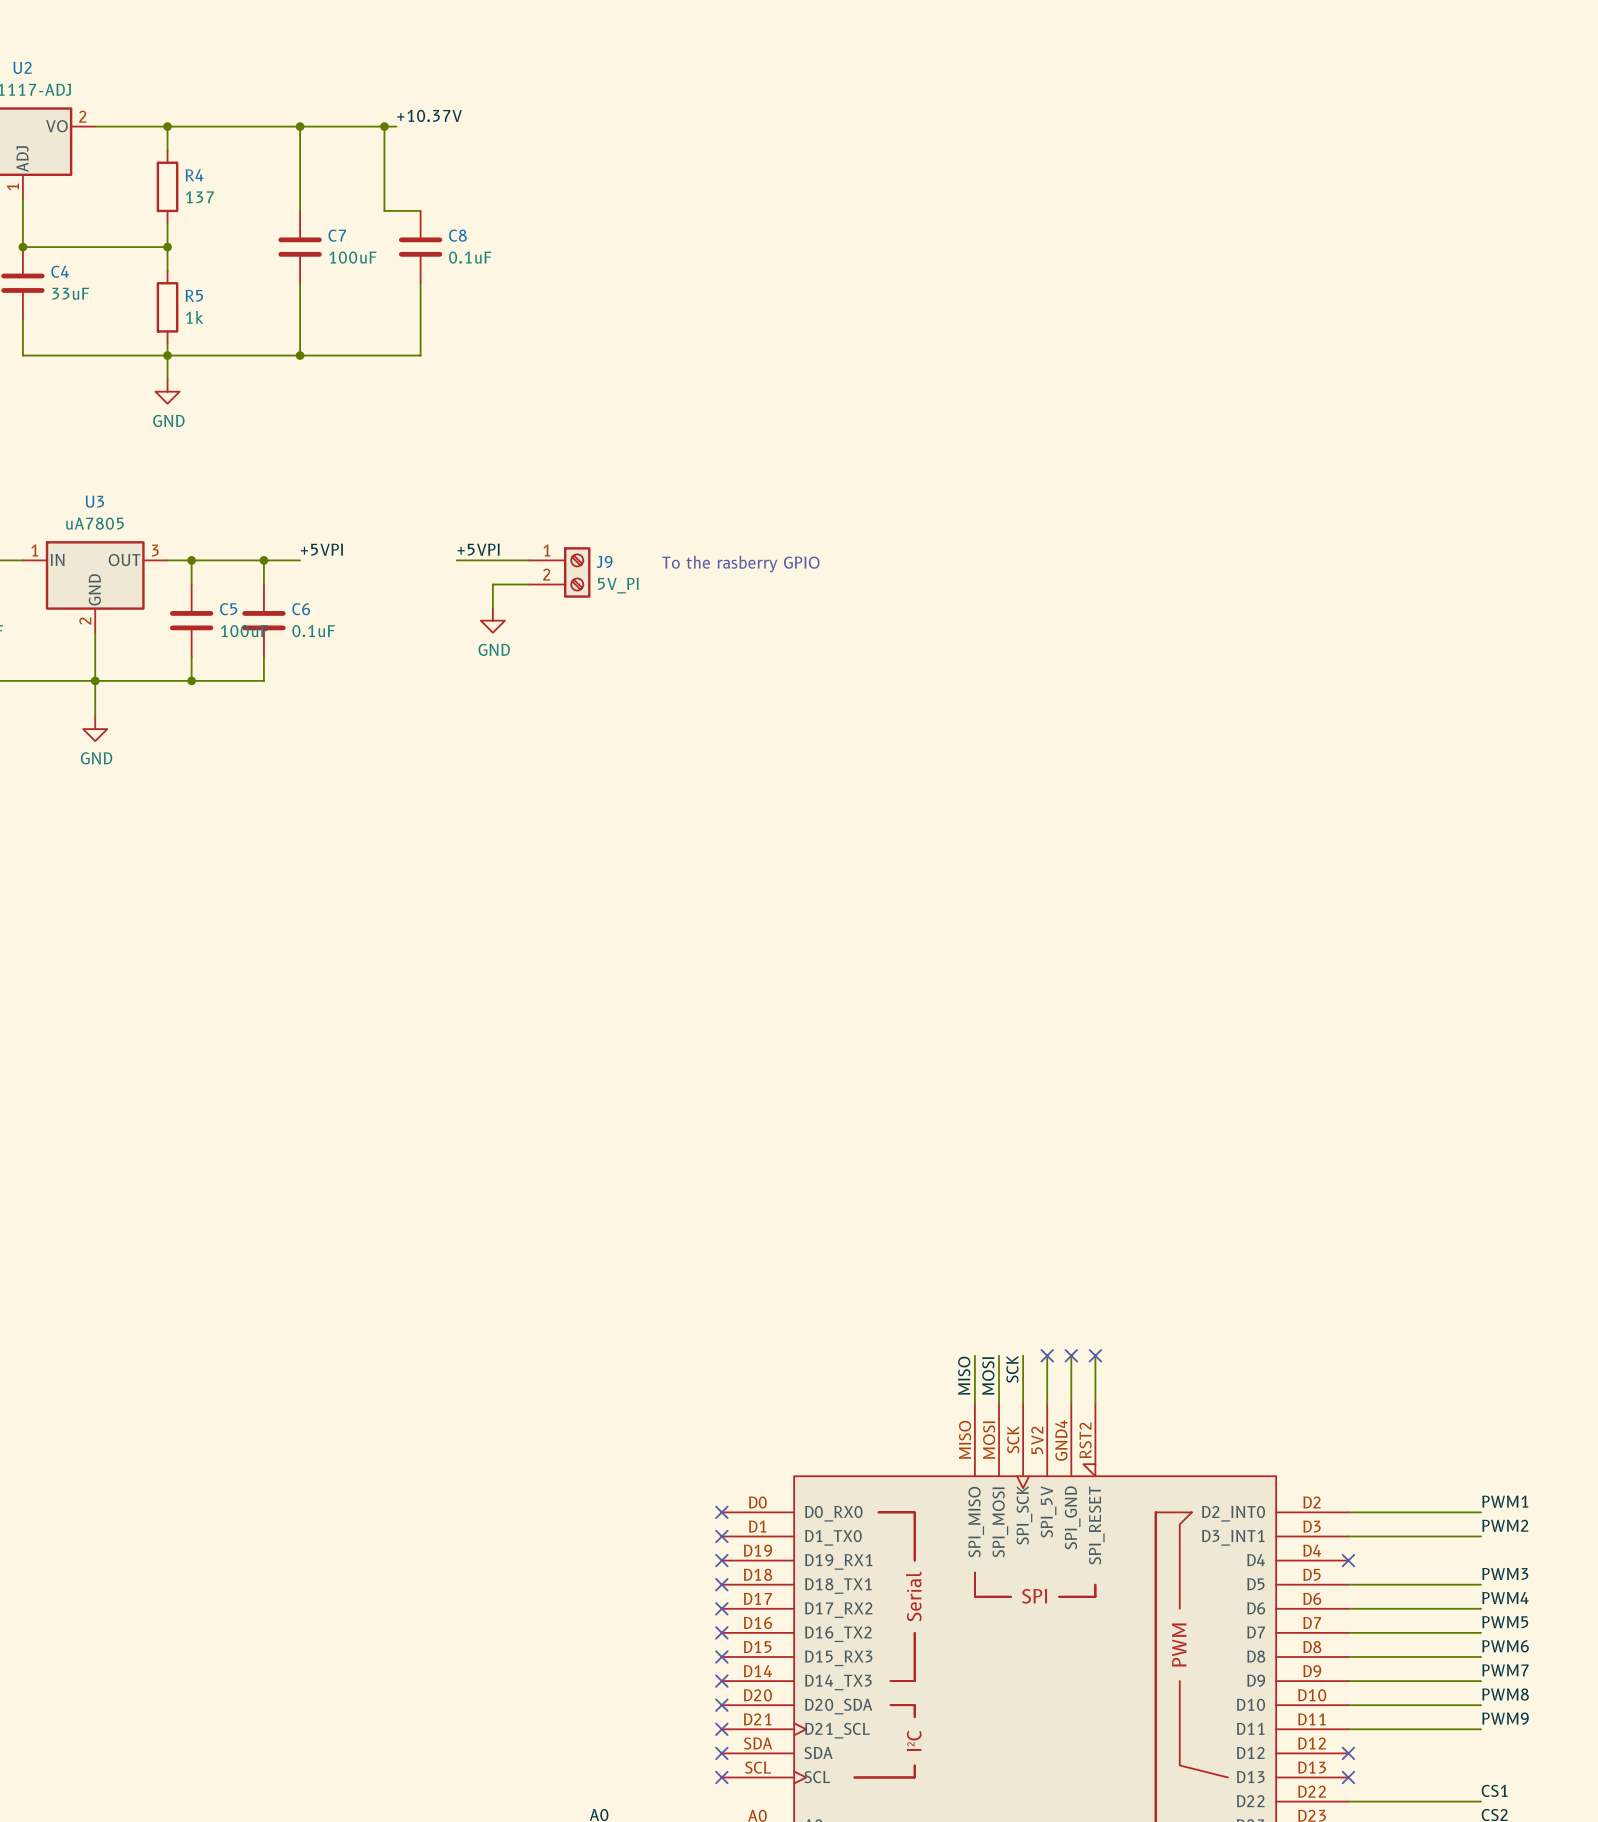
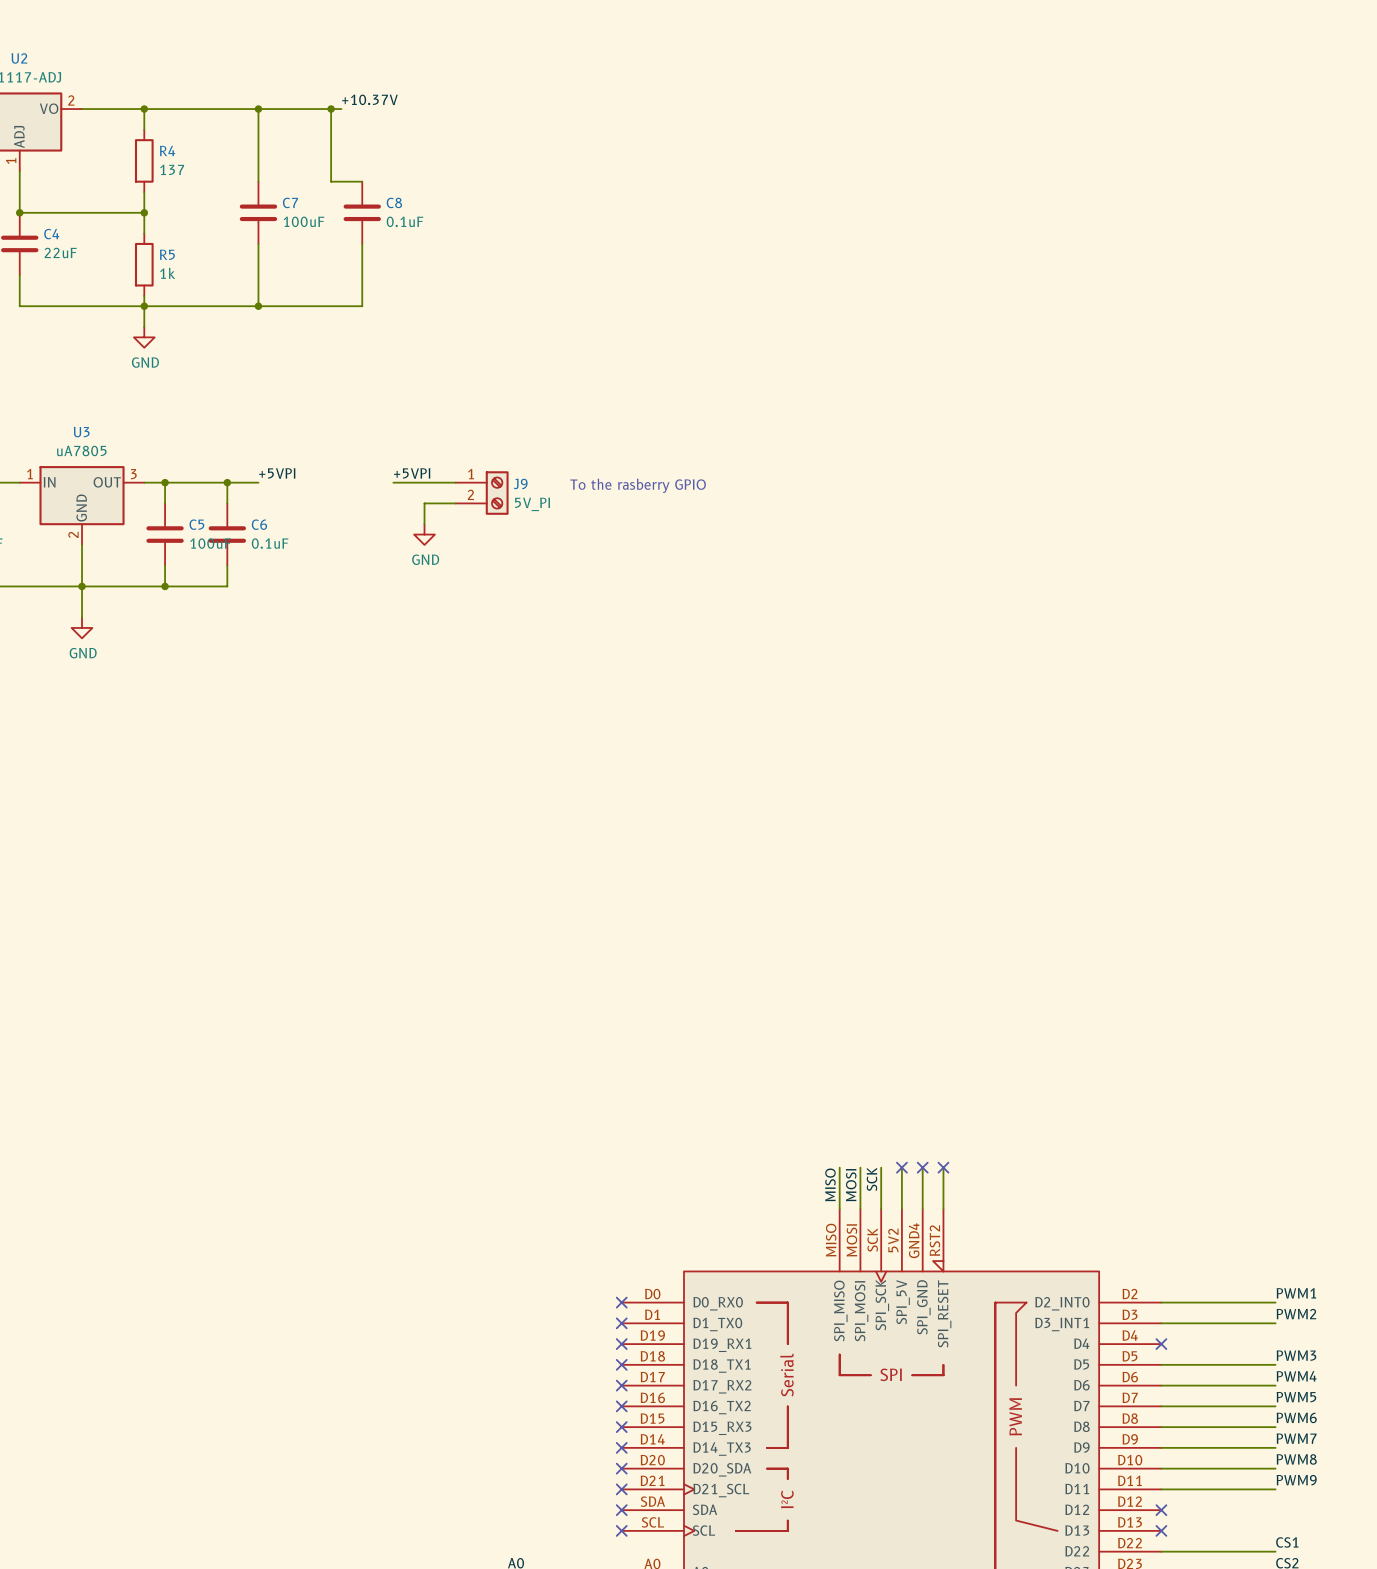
C4 value: 33uF (70, 293) -> 22uF (60, 252)

